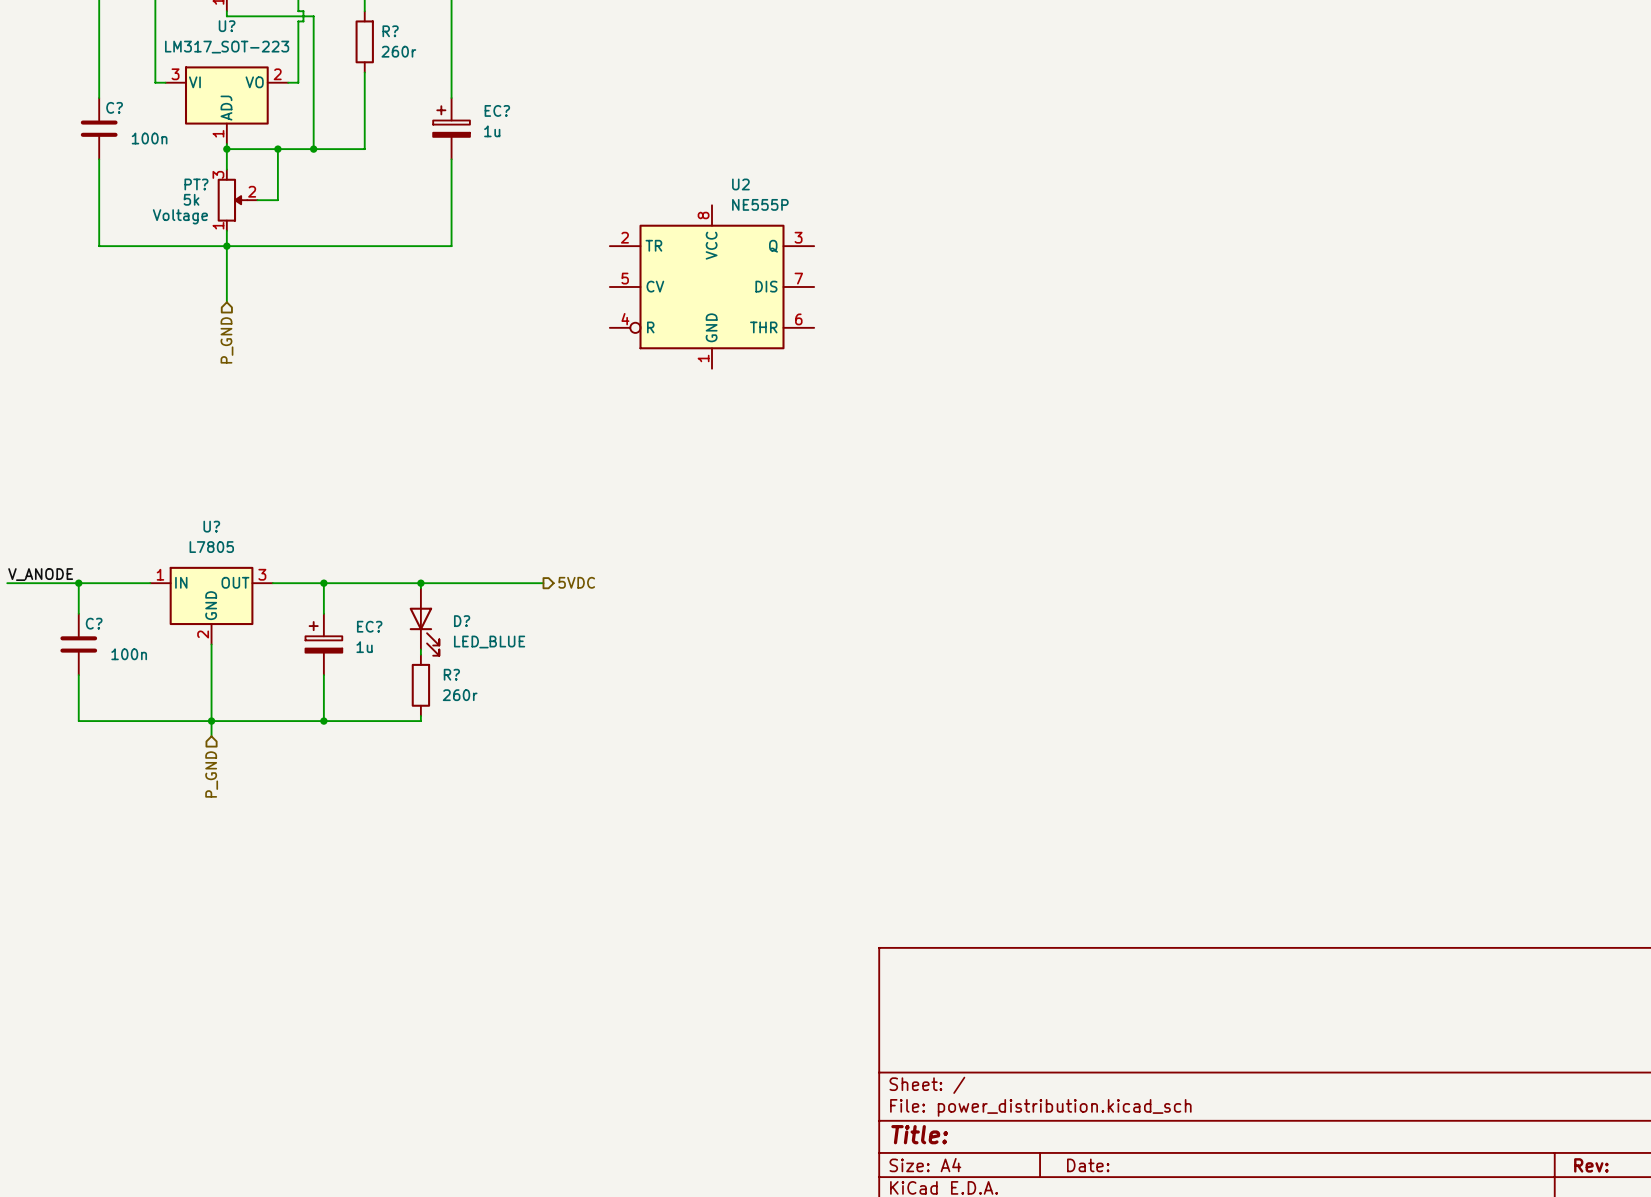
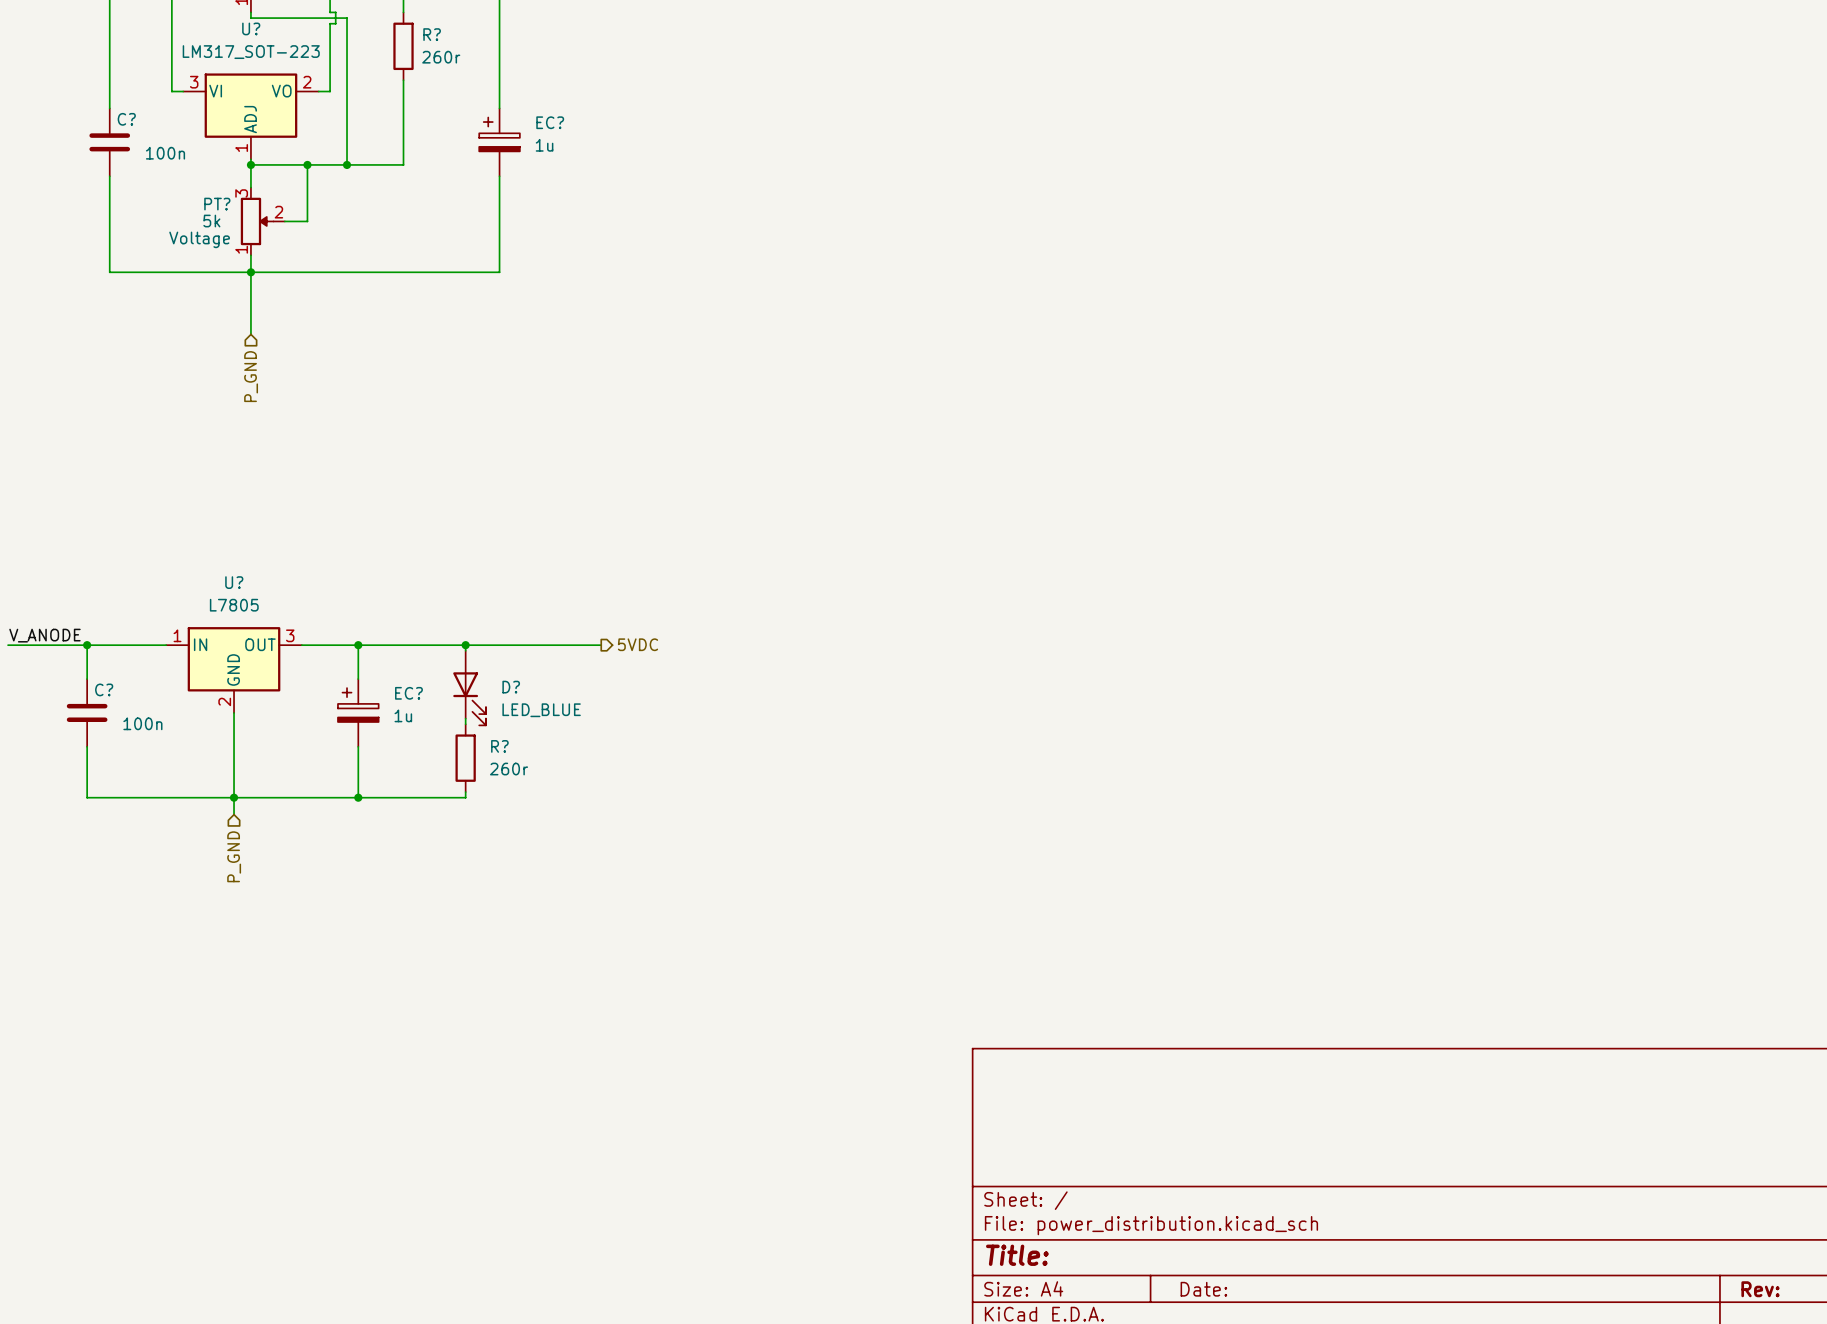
U2: NE555P (712, 286) -> none

